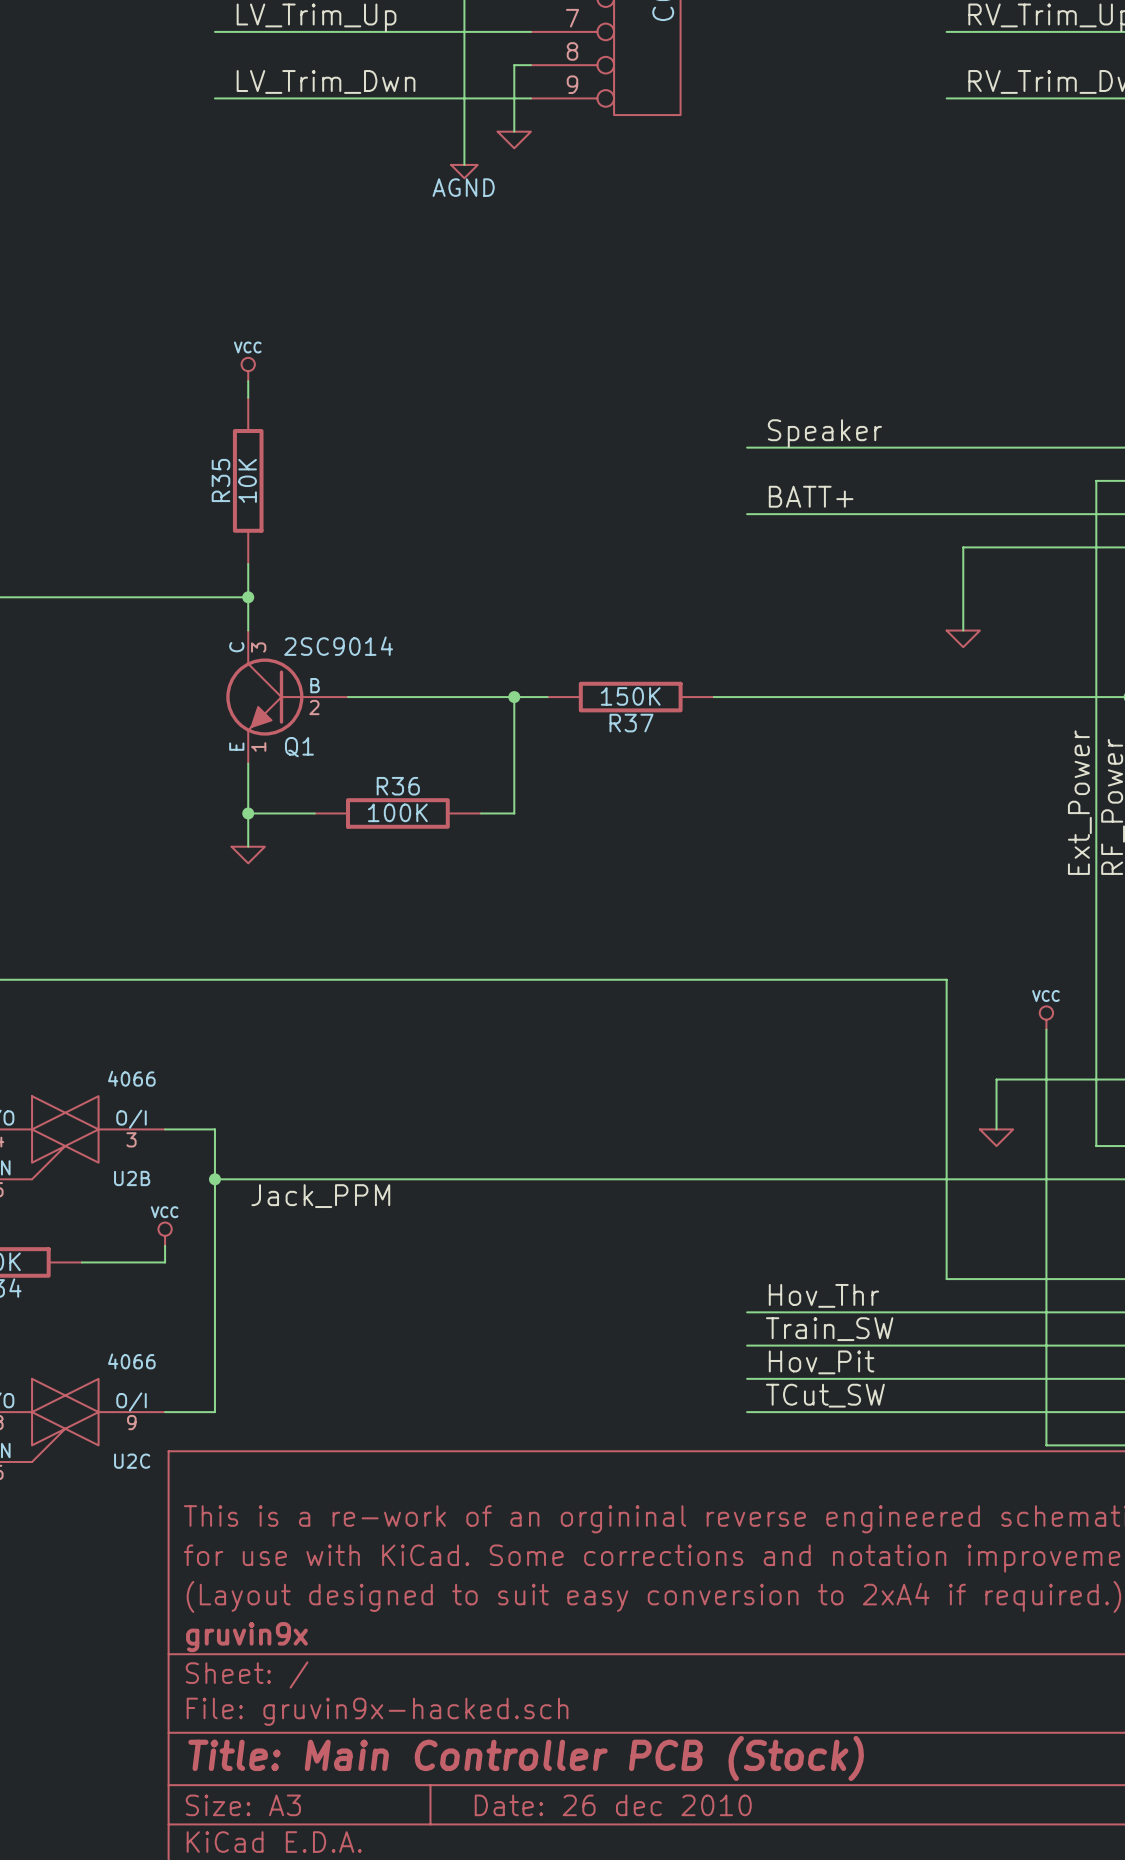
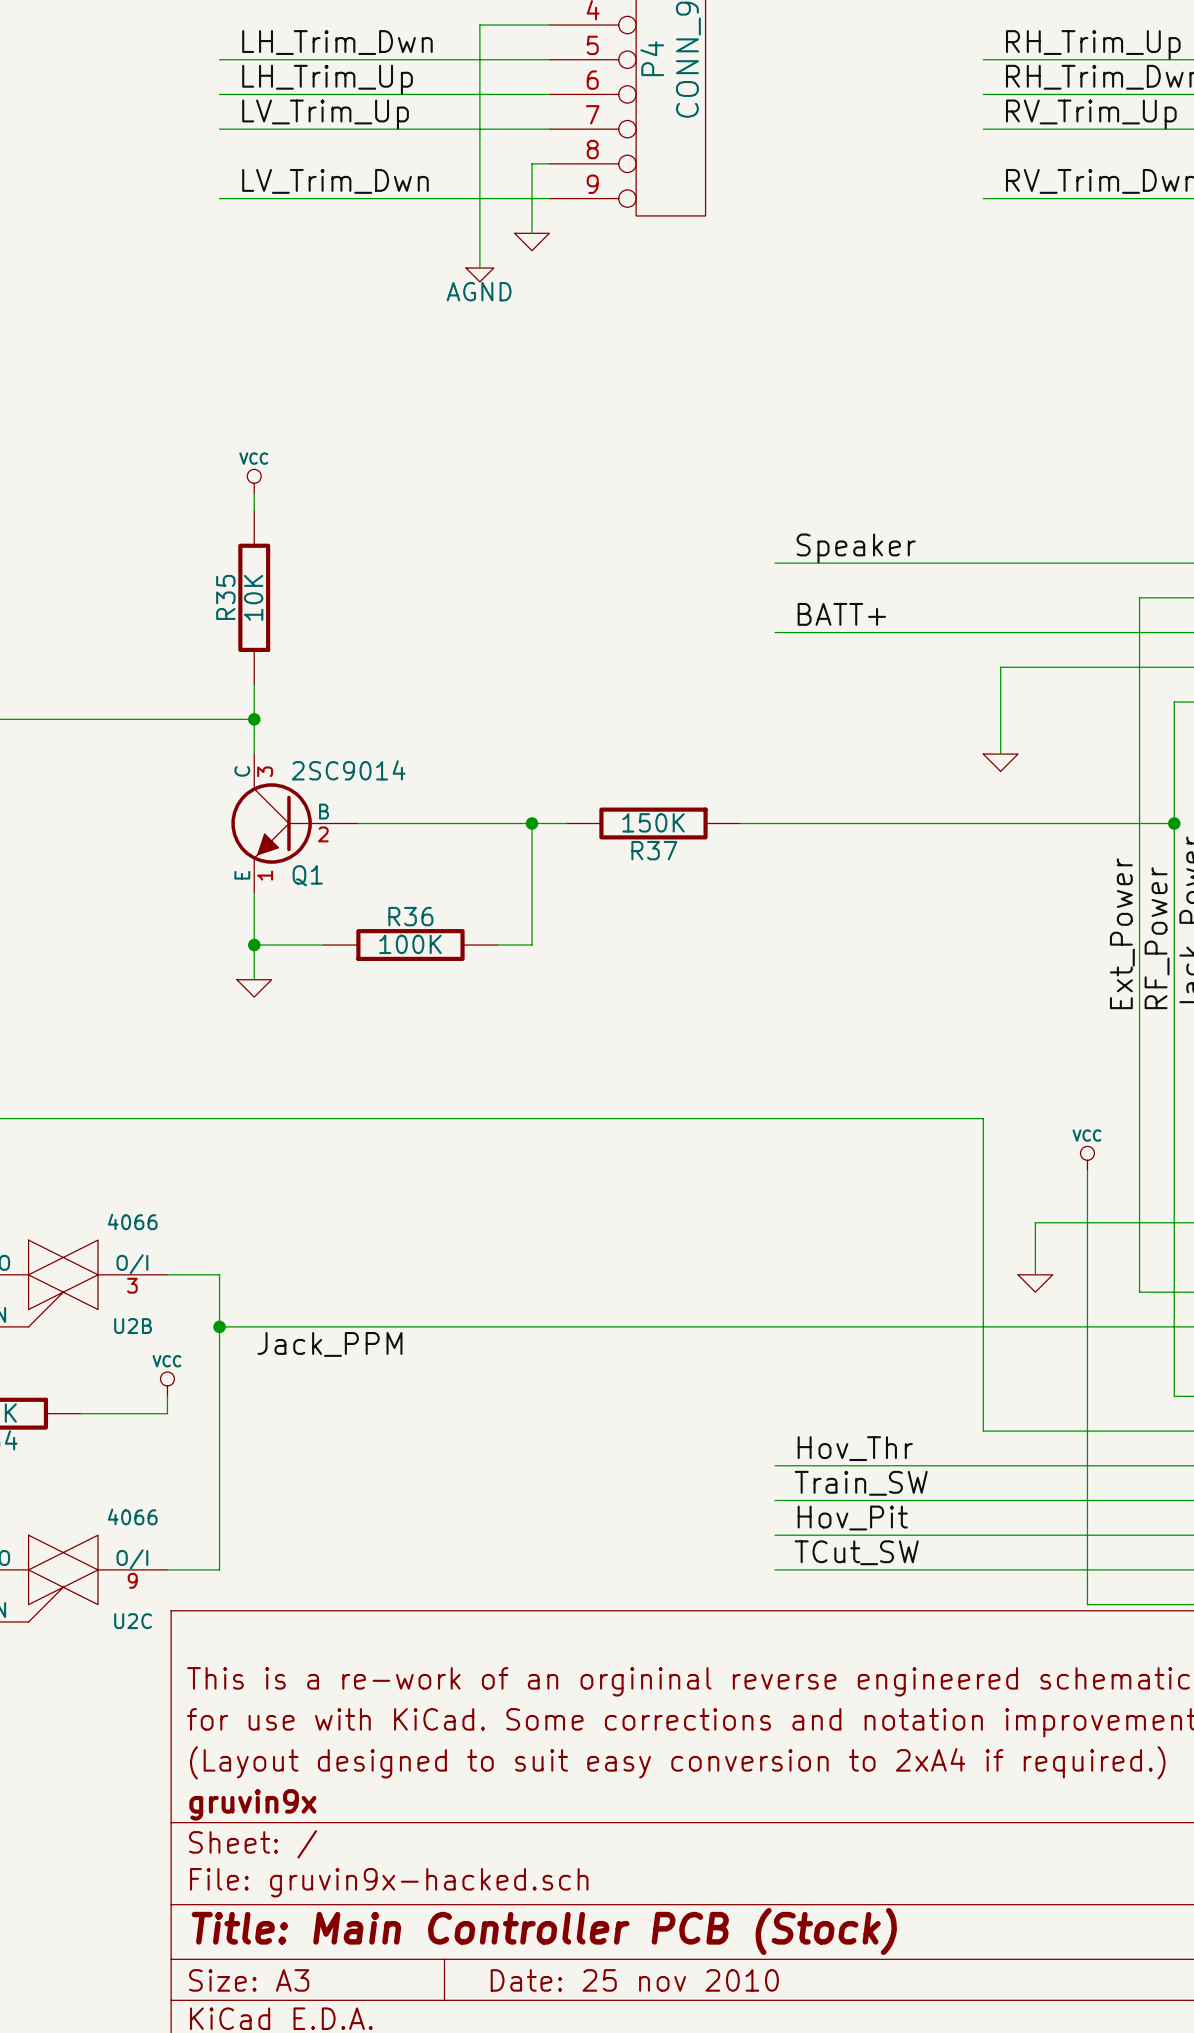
title block: Date: 26 dec 2010 (613, 1805) -> Date: 25 nov 2010 (634, 1980)

